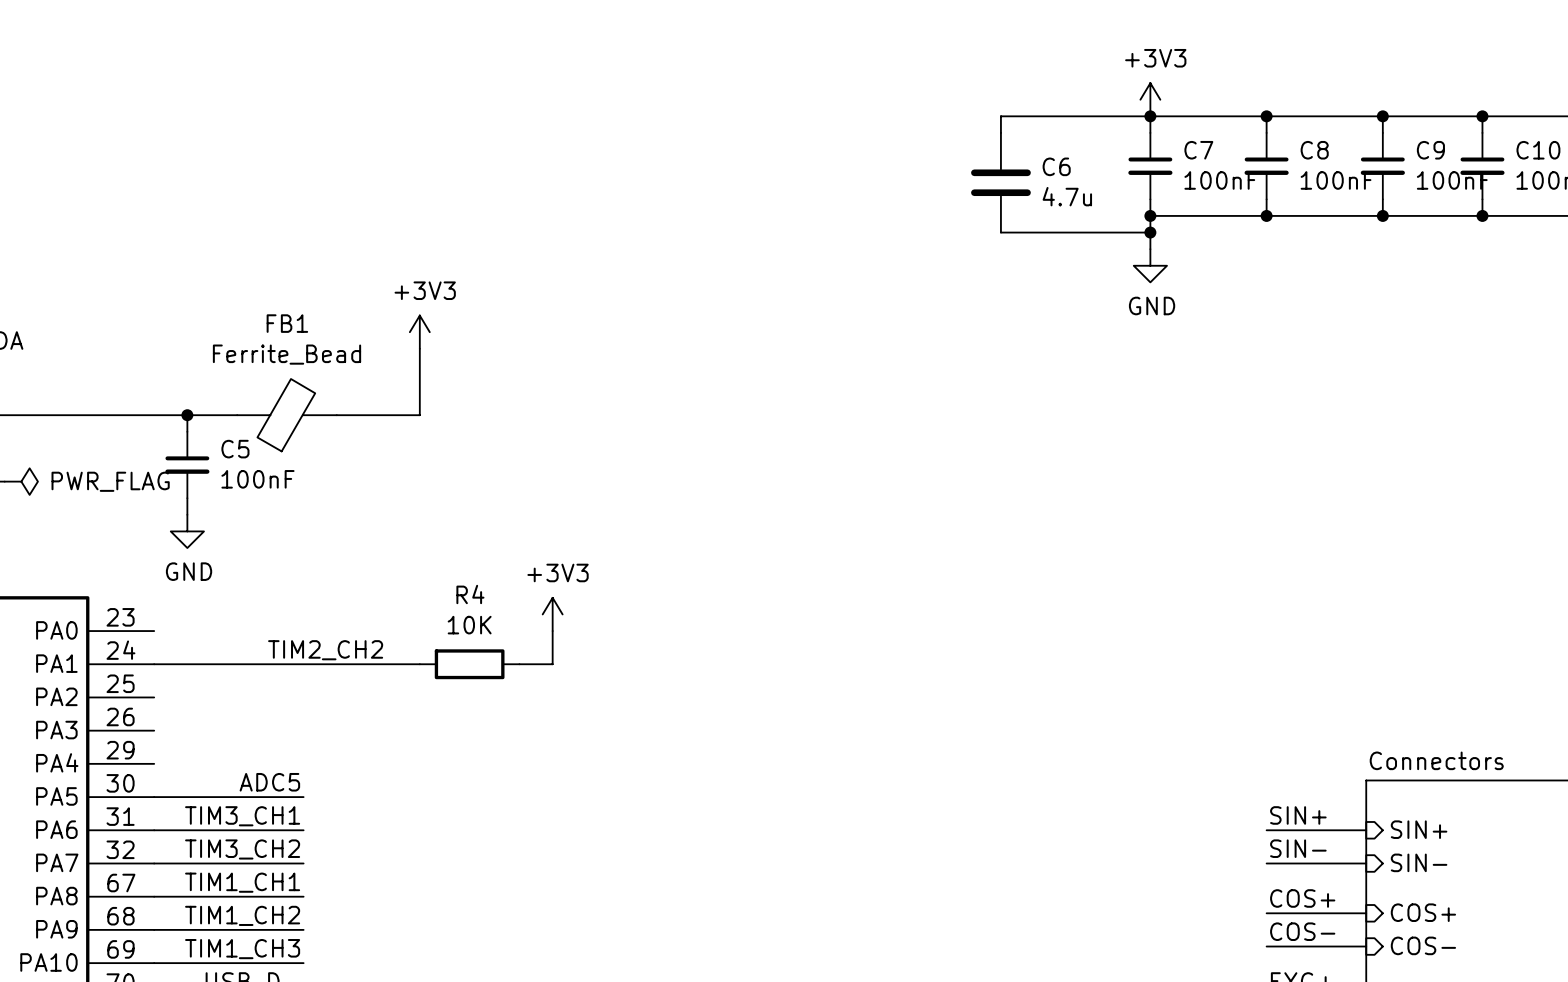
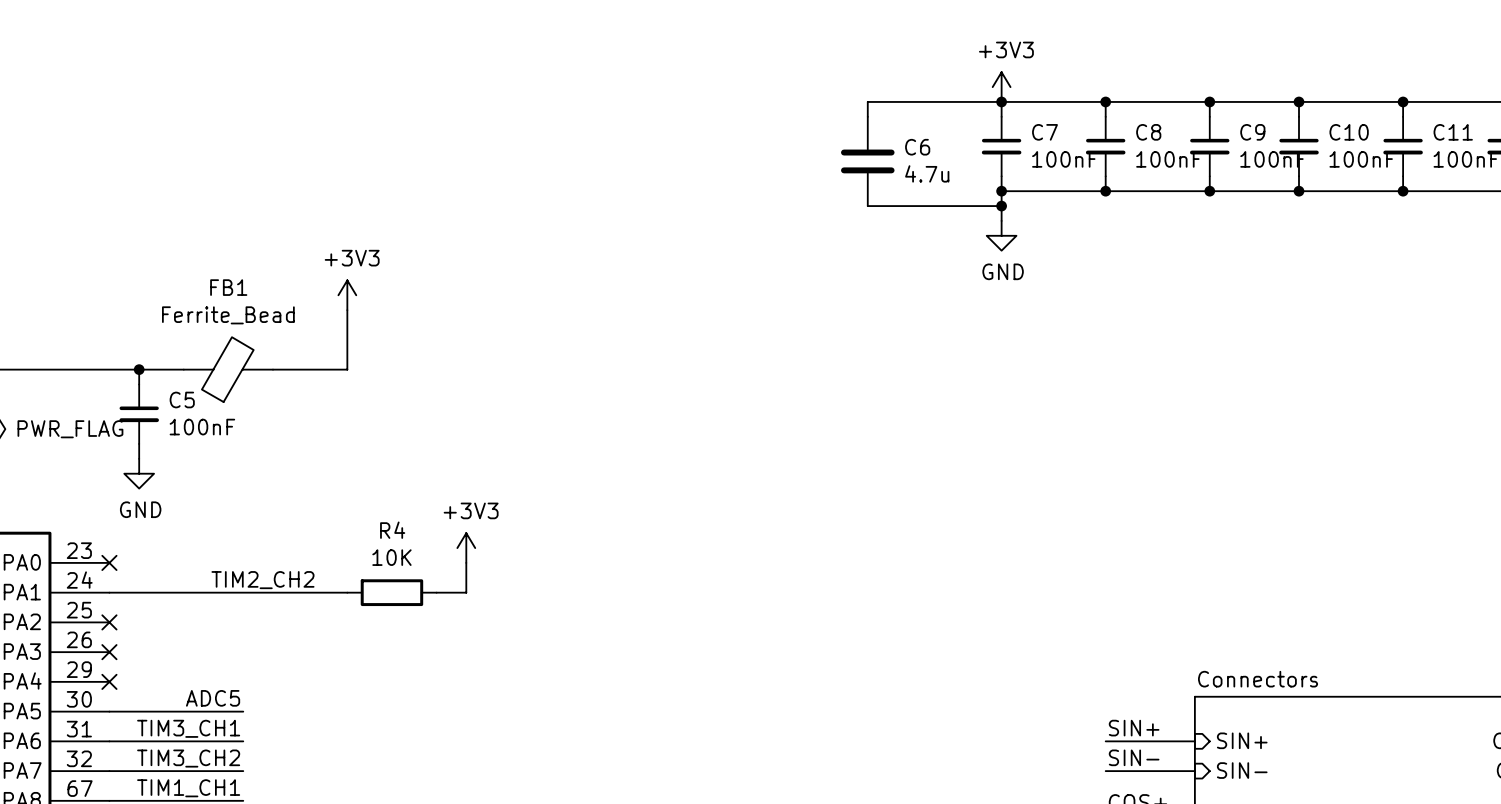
no-connect mark: none -> (109, 562)
no-connect mark: none -> (109, 622)
no-connect mark: none -> (109, 652)
no-connect mark: none -> (109, 681)

